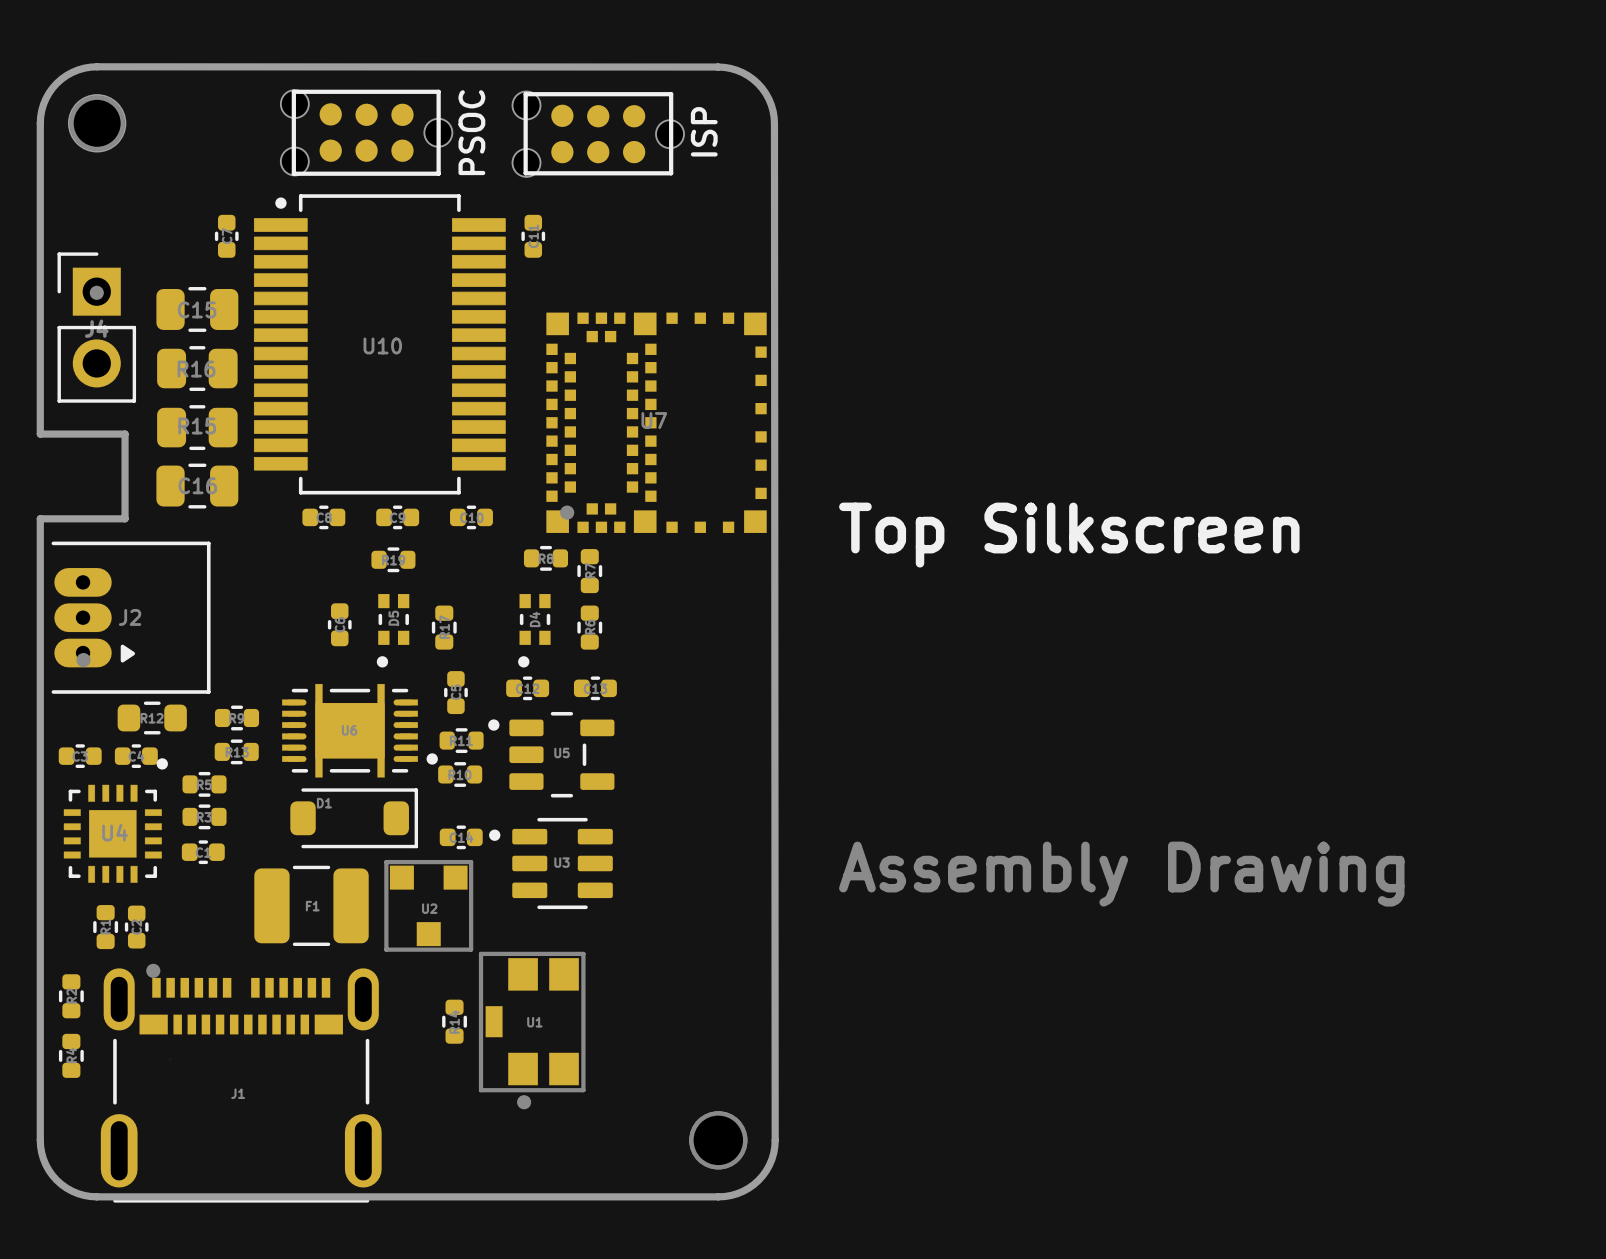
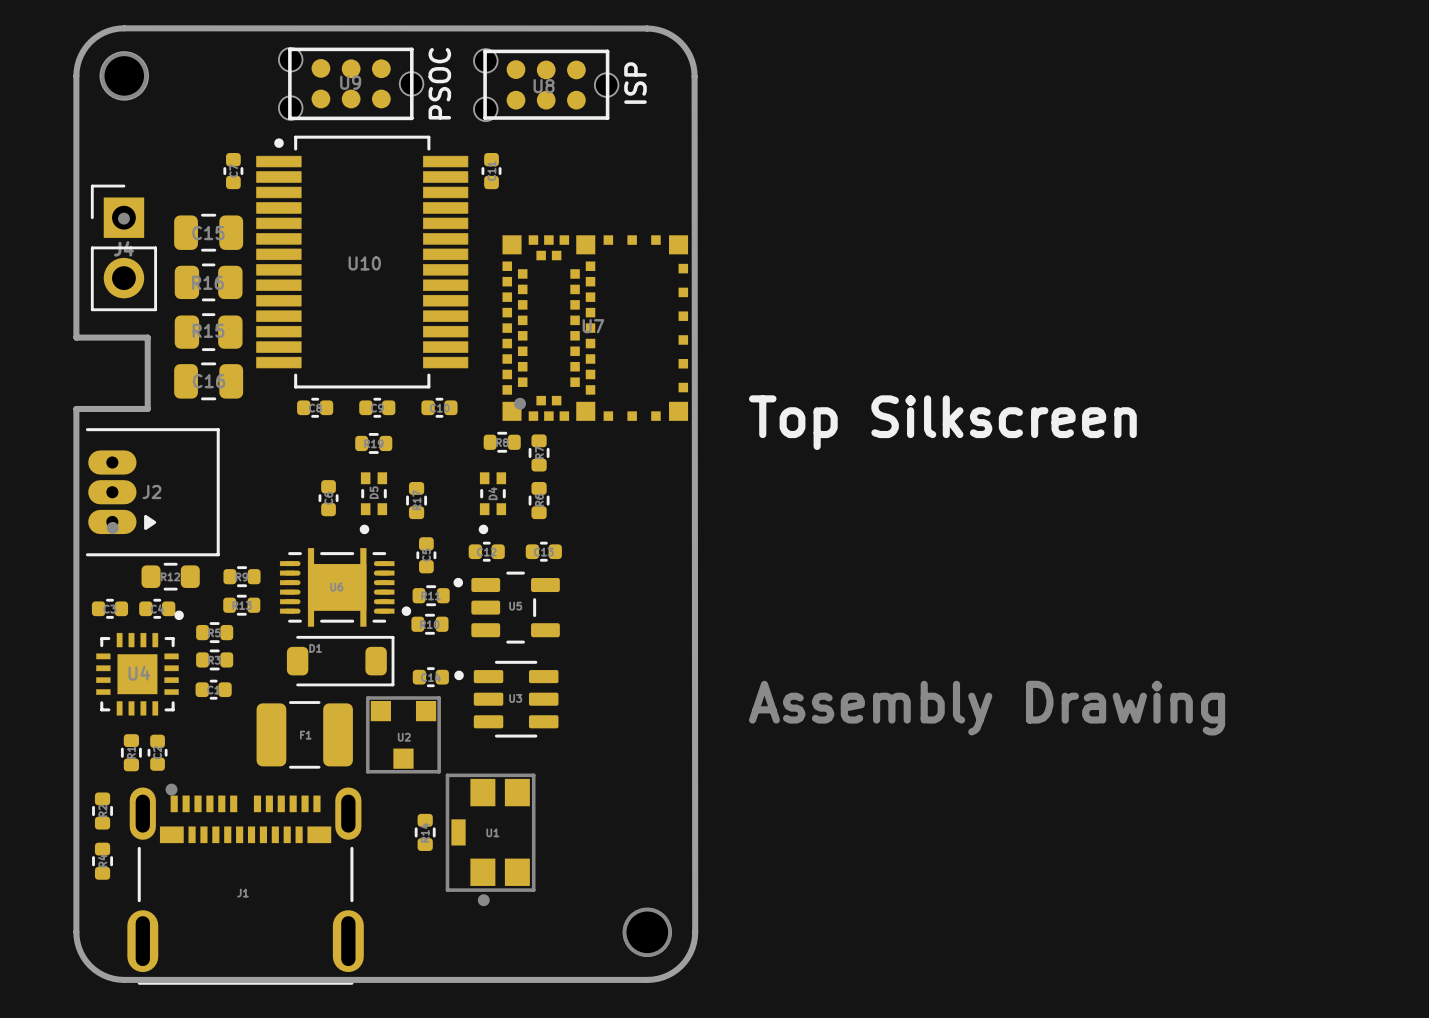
U9 name: none -> U9 (350, 82)
U8 name: none -> U8 (544, 86)

